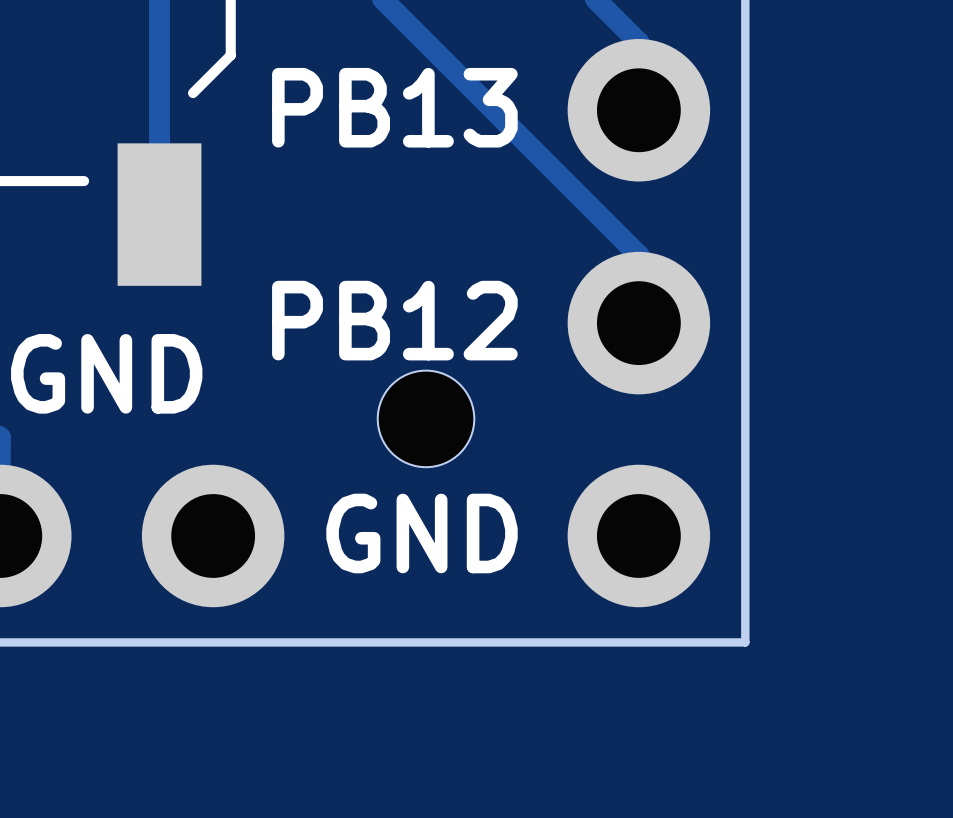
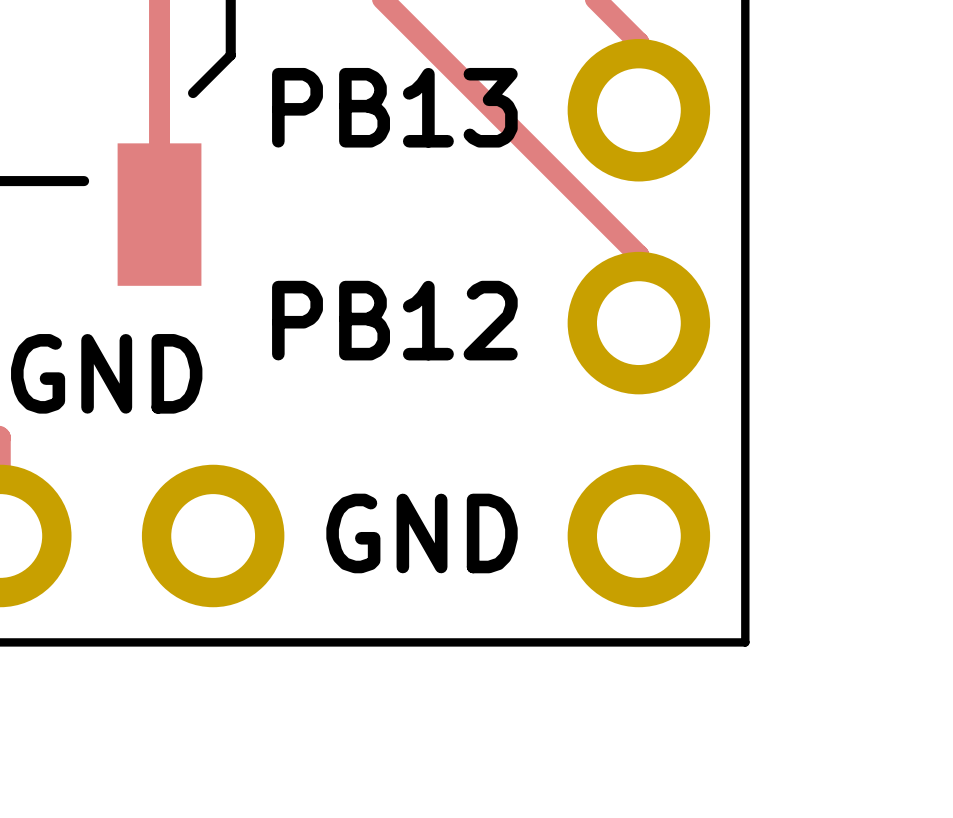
part: (426, 418) -> none

